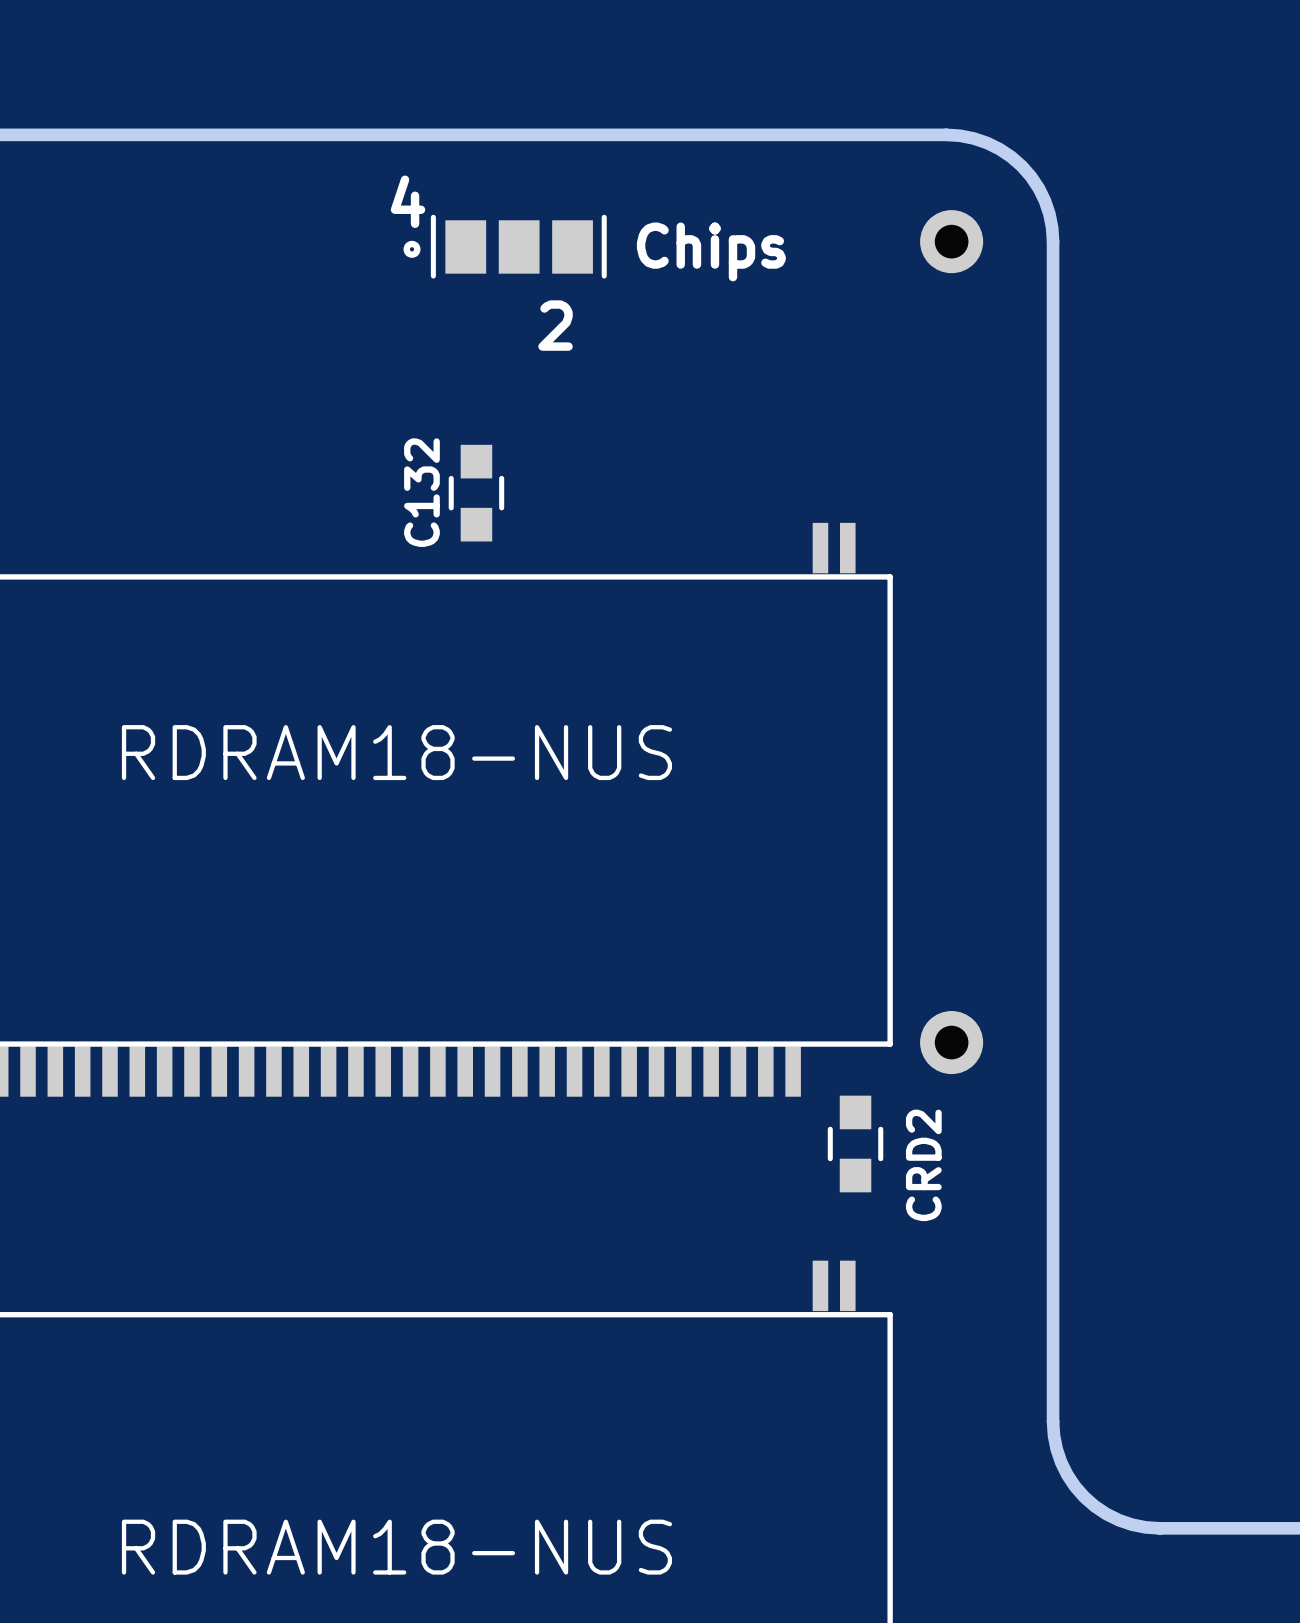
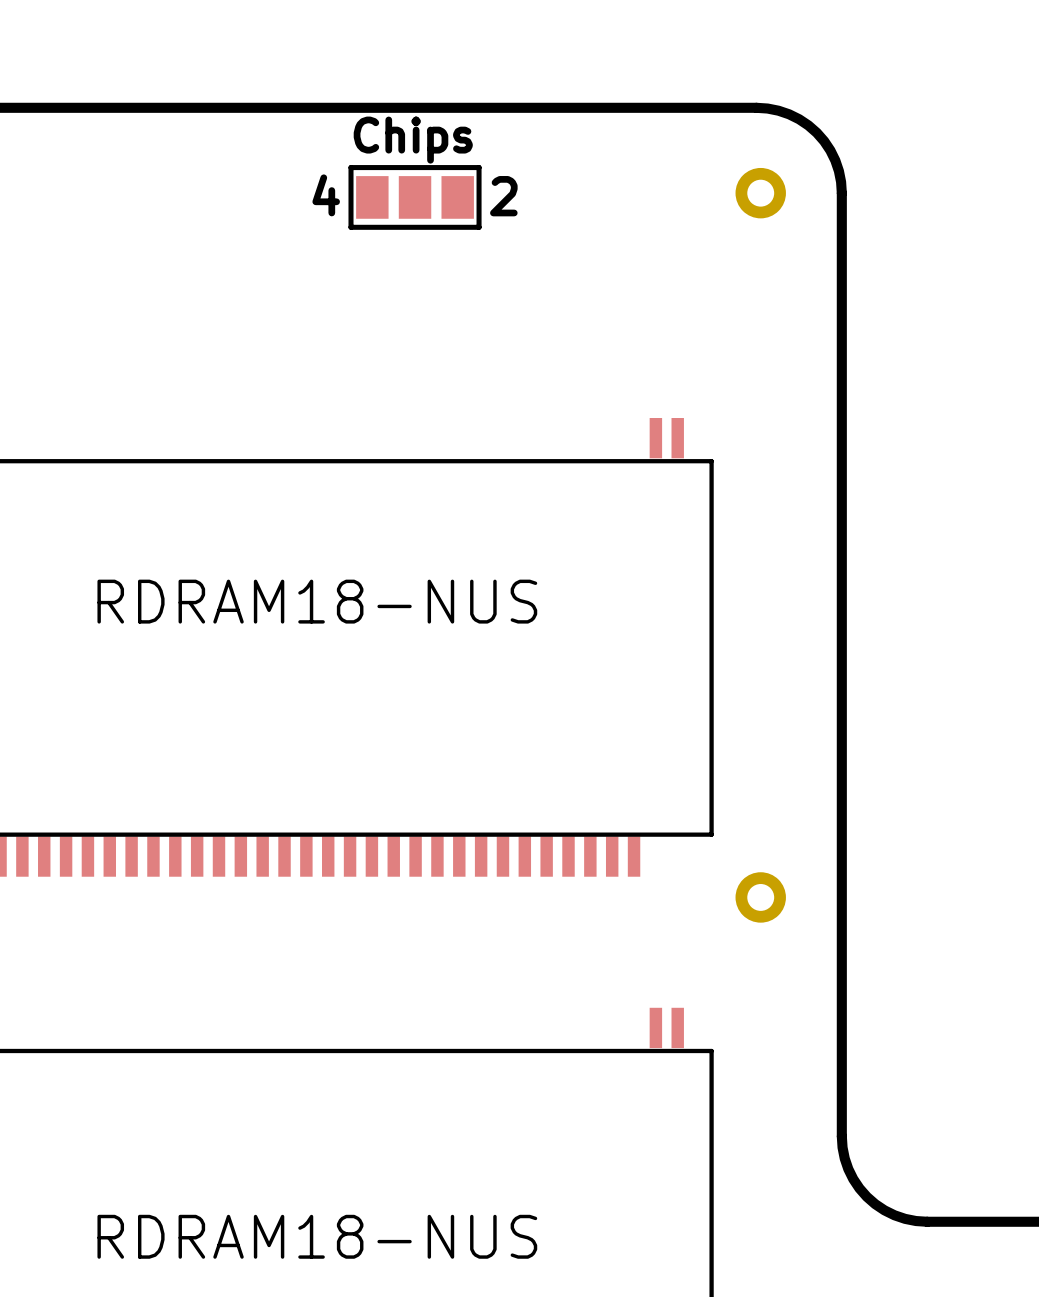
text position: 4 (408, 201) -> 4 (326, 195)
part footprint: [403, 214, 607, 279] -> [348, 165, 482, 230]
text position: Chips (711, 251) -> Chips (413, 140)
text position: 2 (555, 325) -> 2 (503, 196)
C132: (476, 493) -> none
part position: (951, 1042) -> (760, 897)
CRD2: (855, 1143) -> none

